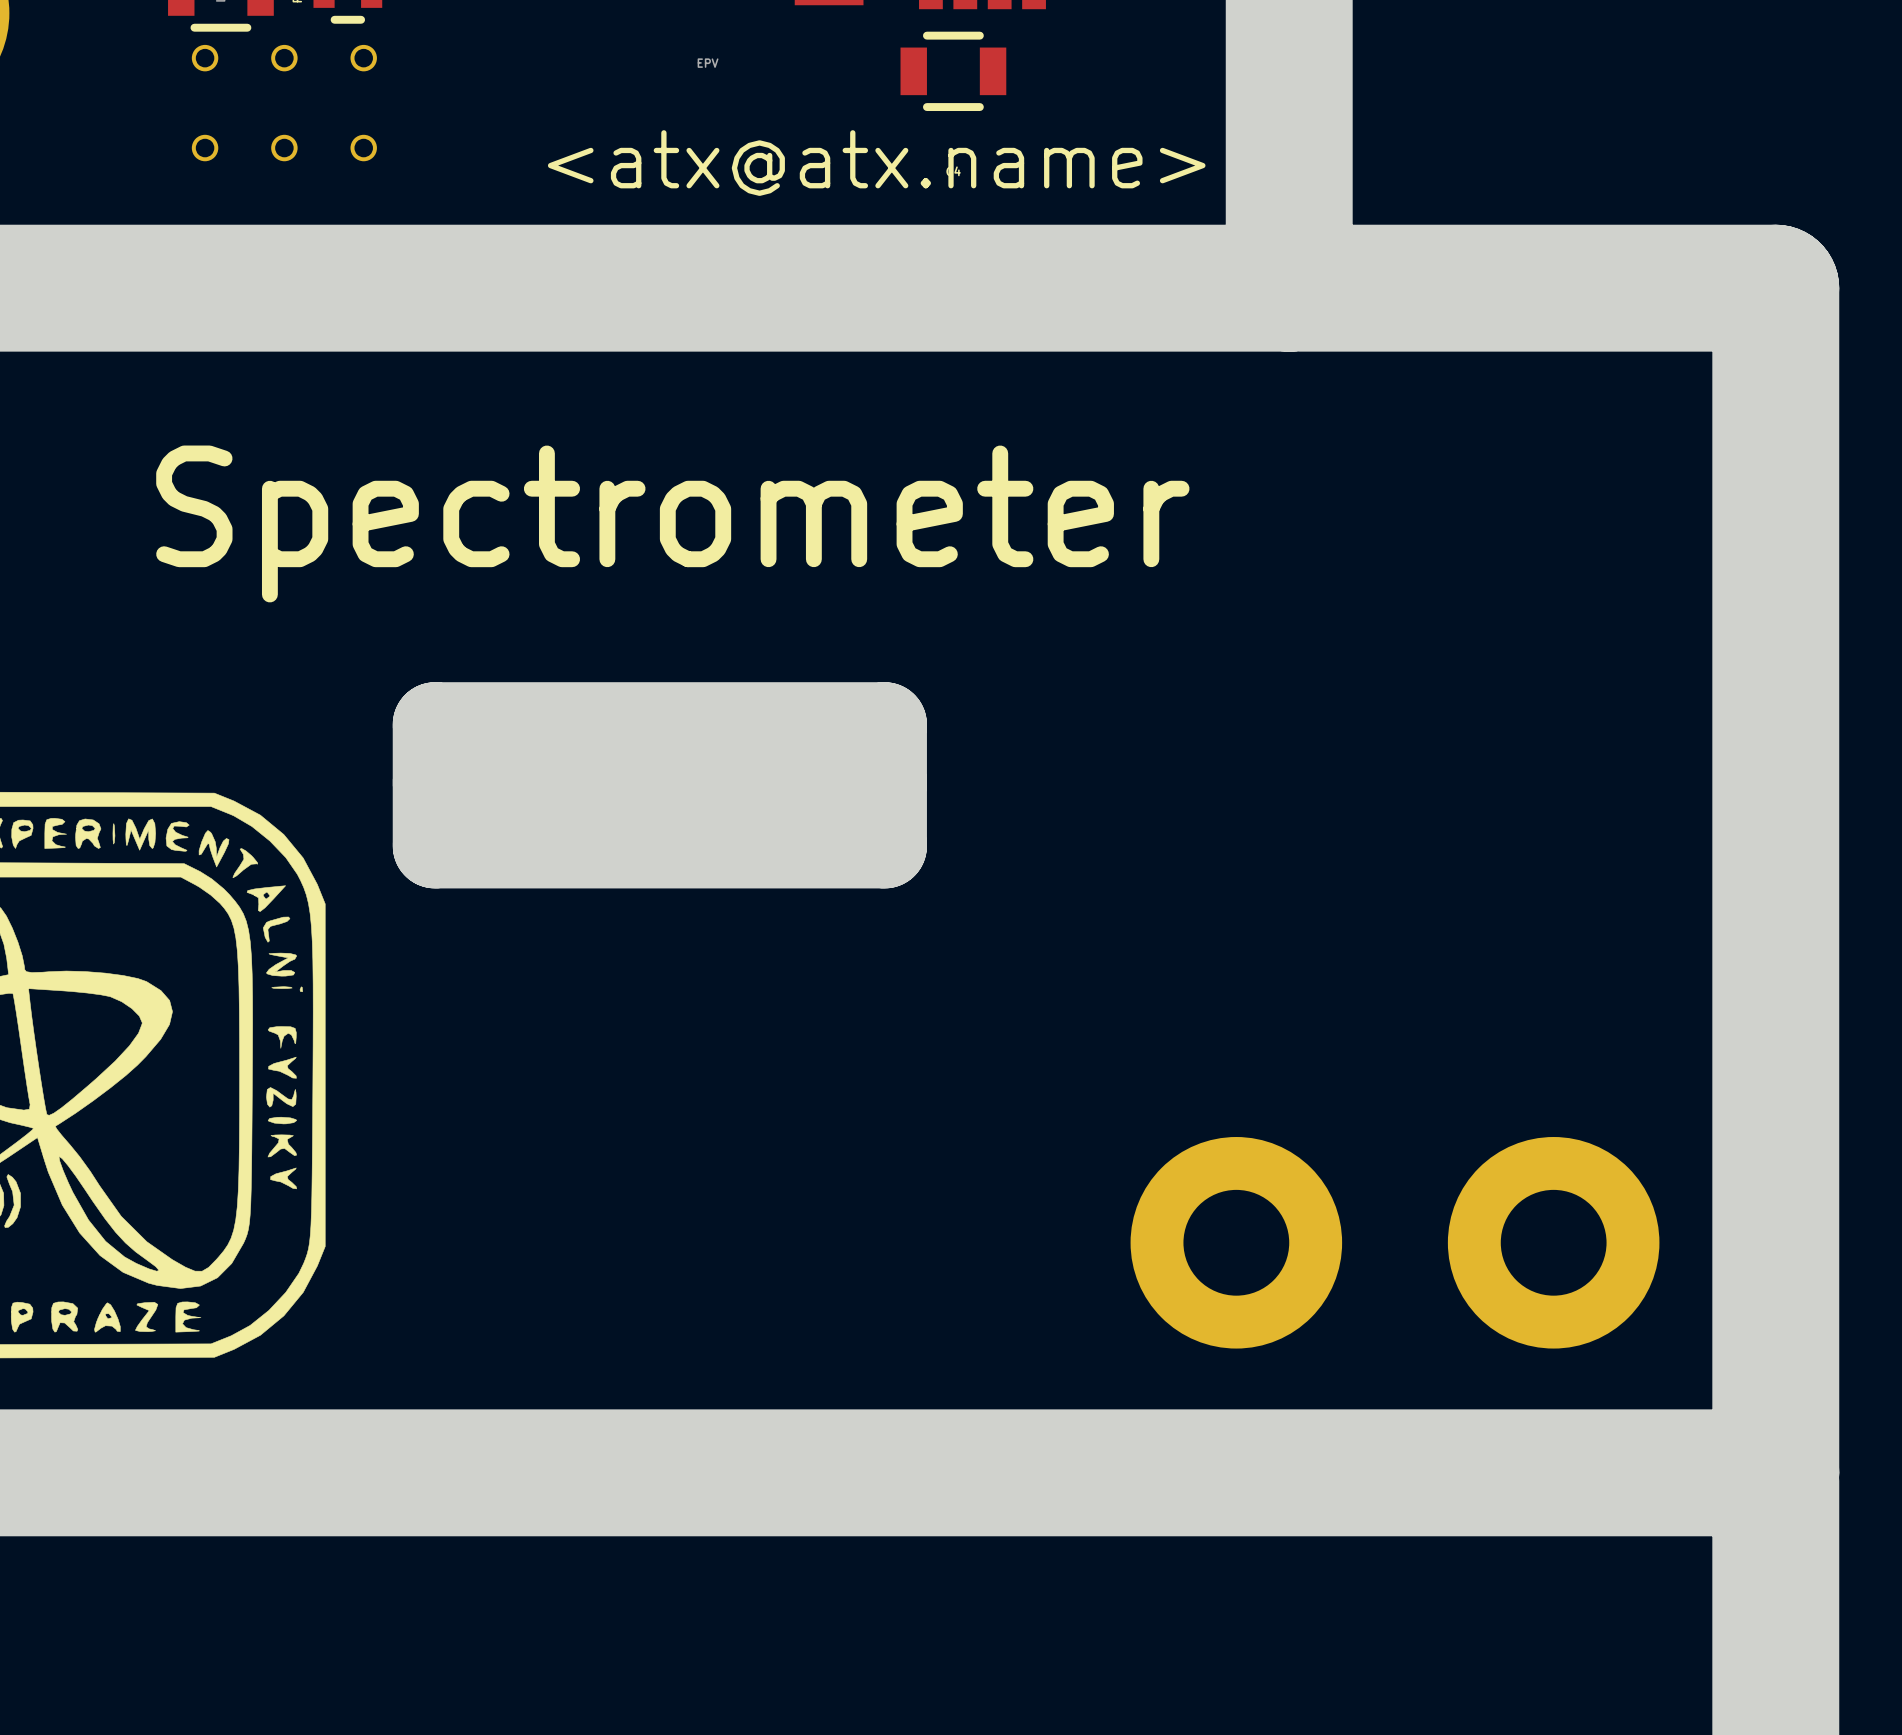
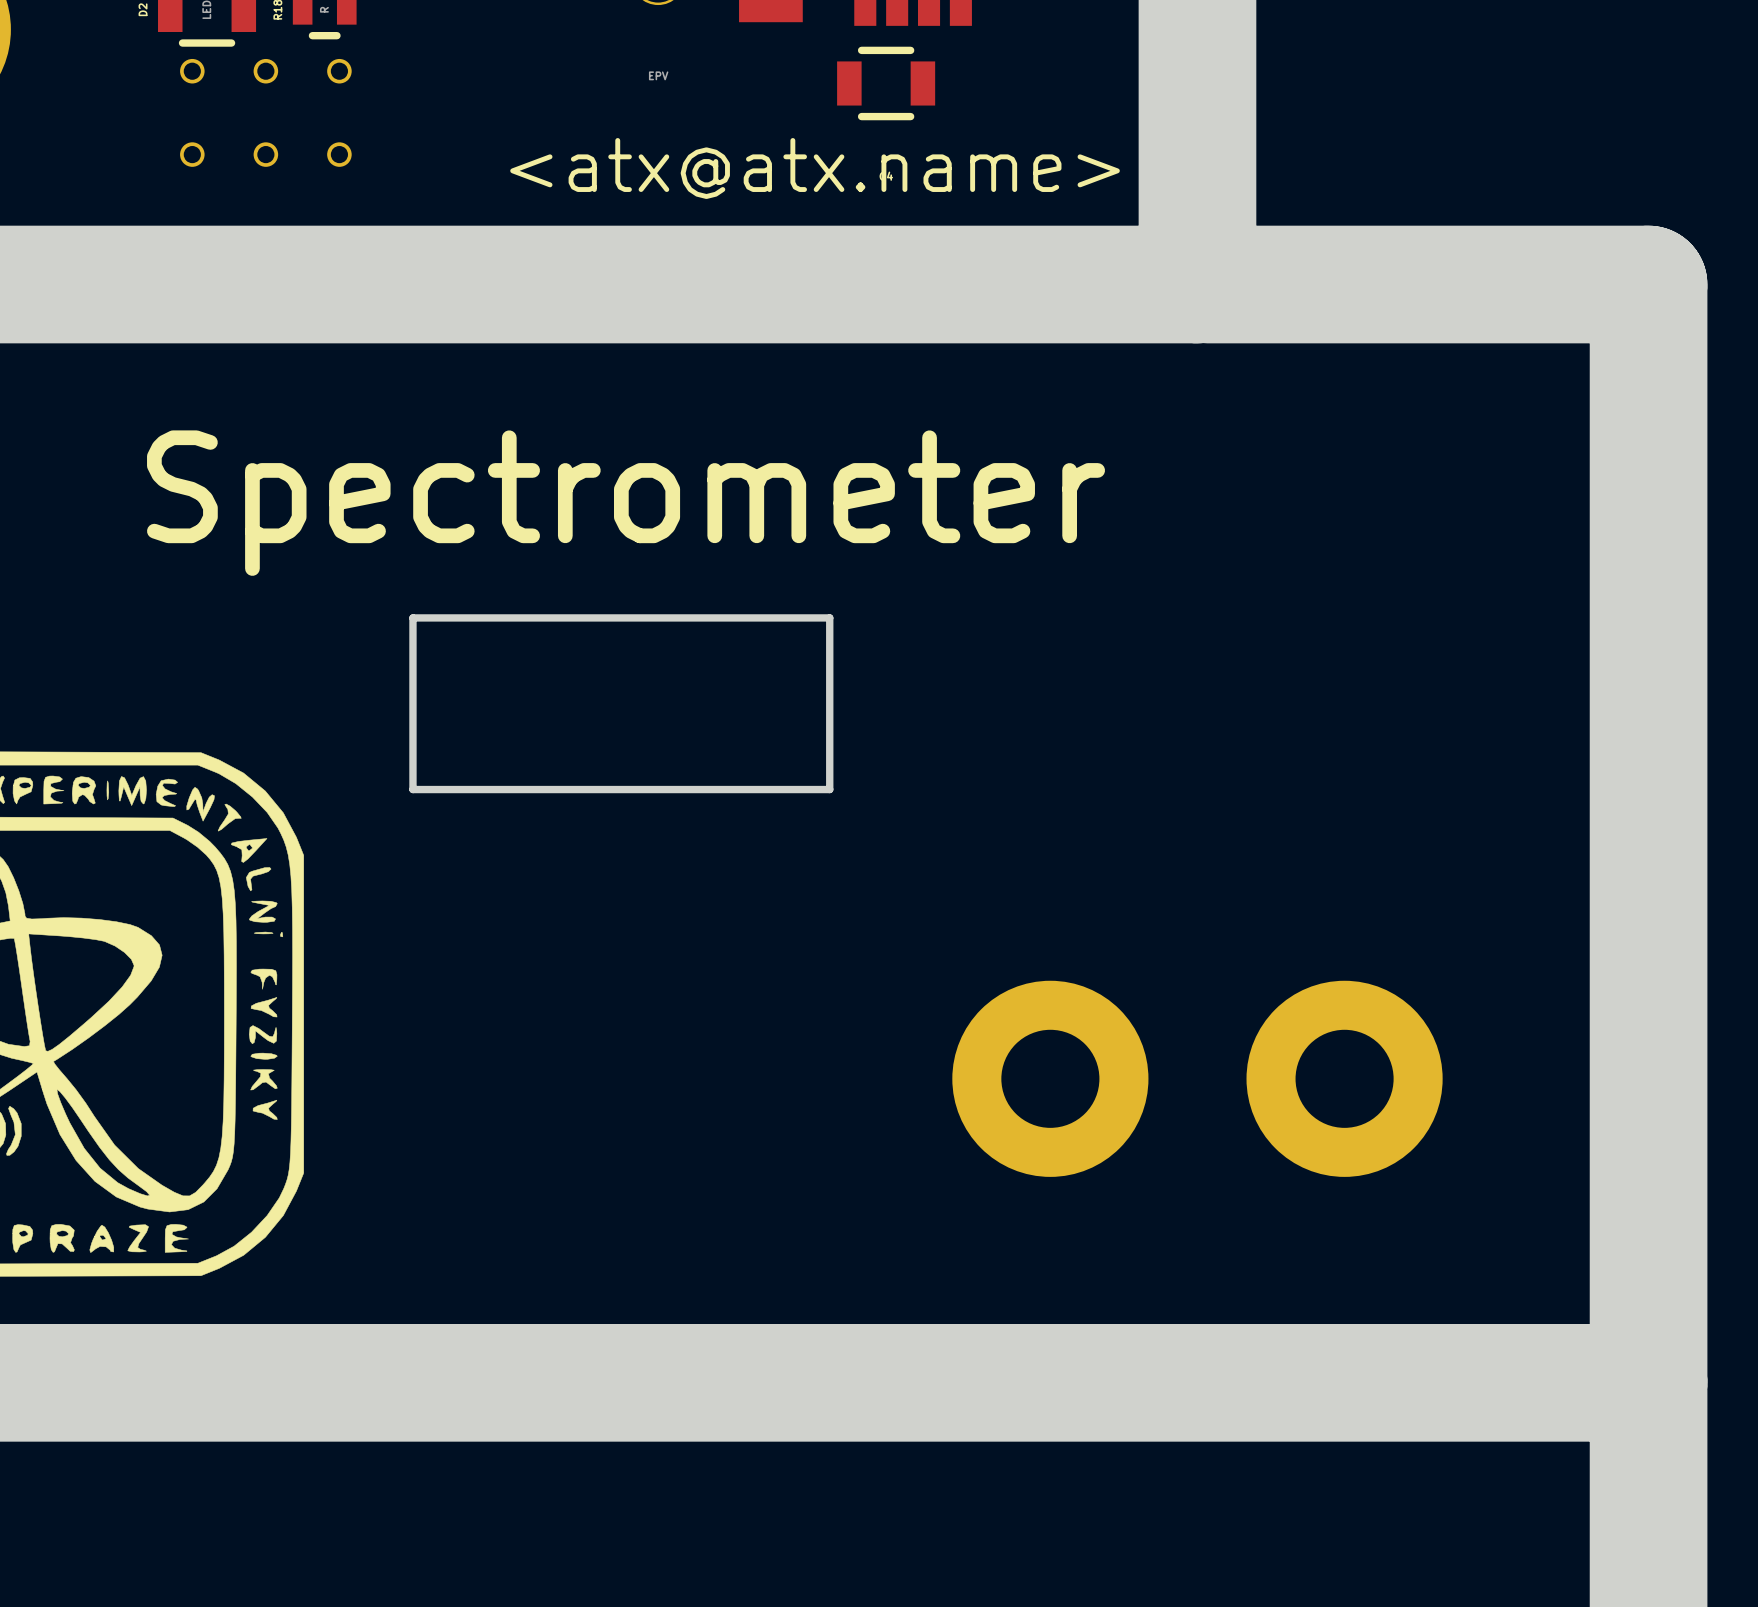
board edge: (435, 724) (435, 846) (884, 846) (884, 724) (435, 724) -> (412, 617) (412, 789) (829, 789) (829, 617) (412, 617)
board edge: (435, 782) (884, 782) -> none
part: none -> (1050, 1078)
part: none -> (1344, 1078)
part: (1236, 1242) -> none
part: (1553, 1242) -> none

